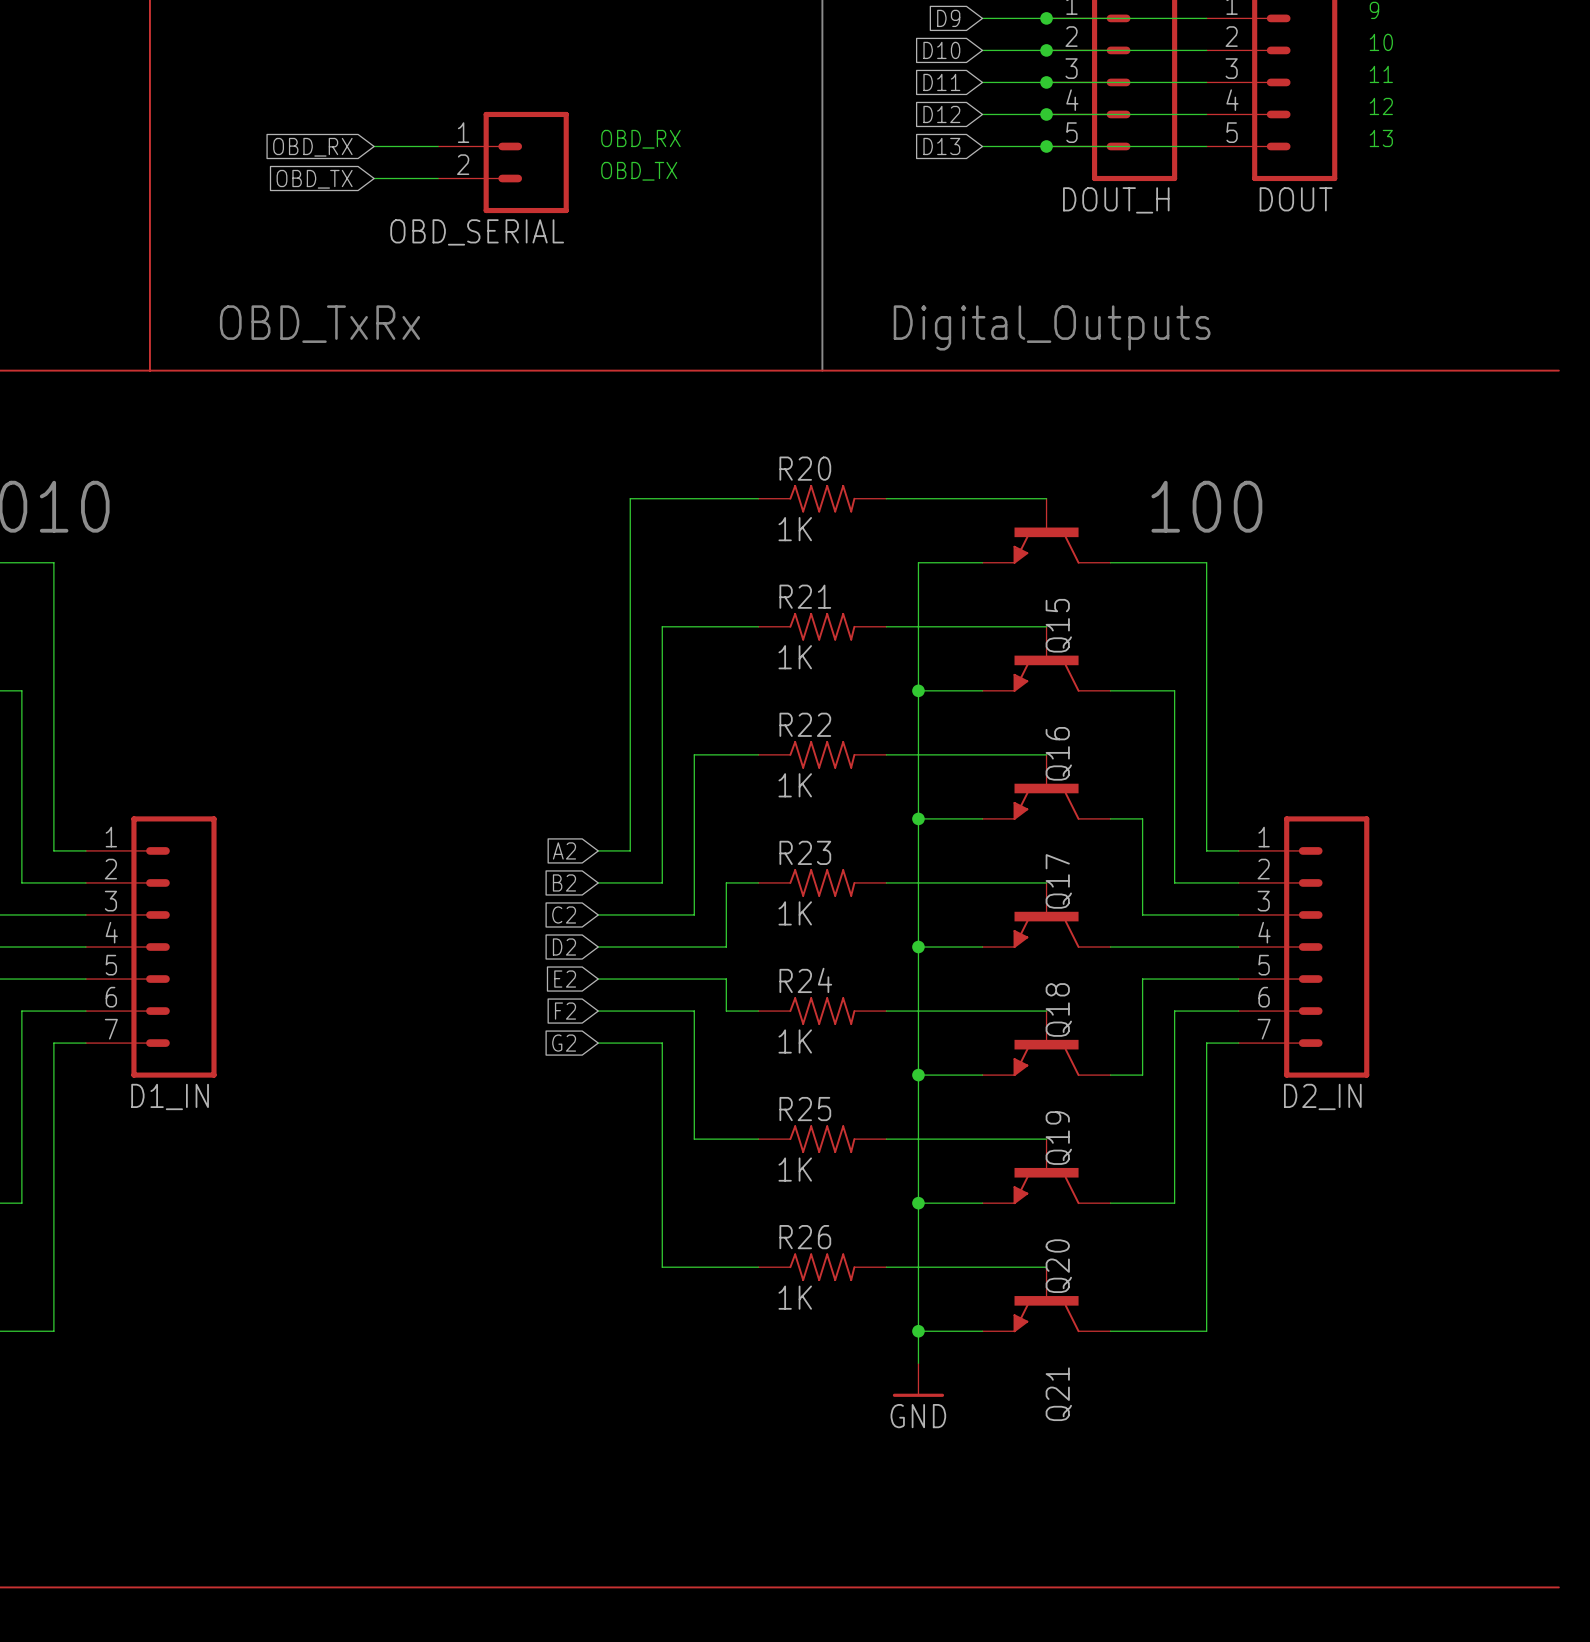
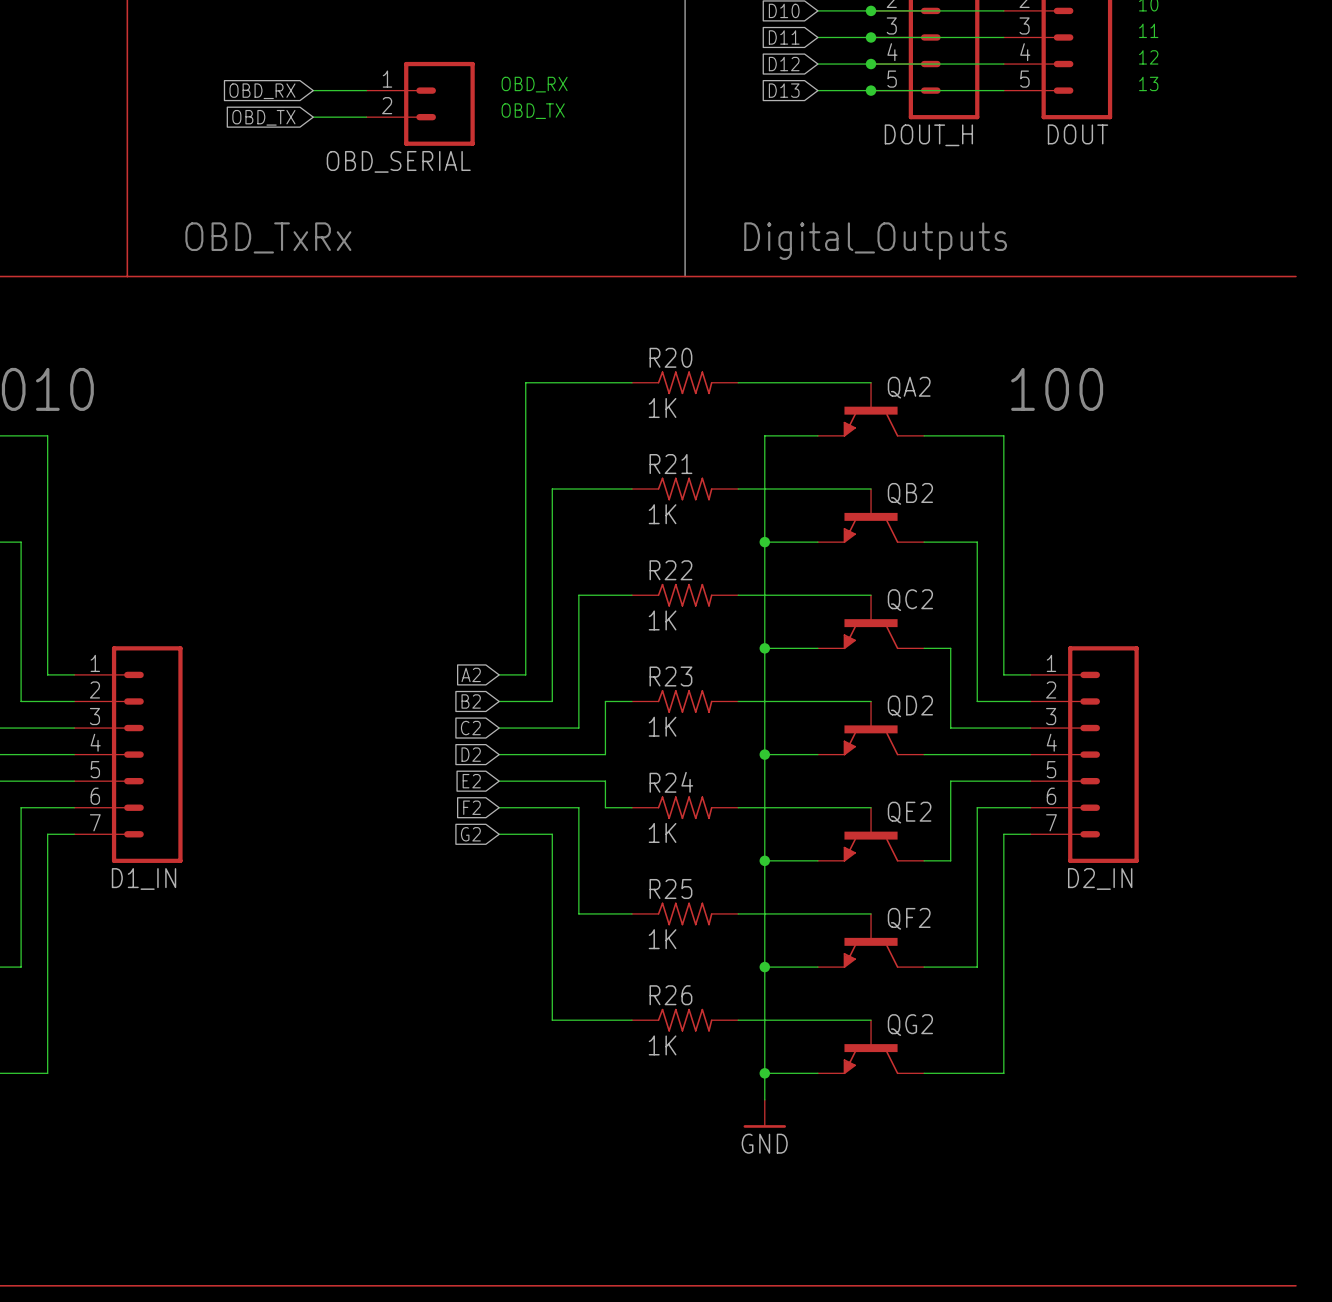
text position: 100 (1206, 506) -> 100 (1057, 389)
Q15 name: Q15 (1058, 625) -> QA2 (909, 387)
Q16 name: Q16 (1058, 753) -> QB2 (910, 493)
Q17 name: Q17 (1058, 881) -> QC2 (910, 600)
Q18 name: Q18 (1058, 1009) -> QD2 (910, 706)
Q19 name: Q19 (1058, 1138) -> QE2 (909, 812)
Q20 name: Q20 (1058, 1266) -> QF2 (909, 918)
Q21 name: Q21 (1058, 1394) -> QG2 (910, 1025)

